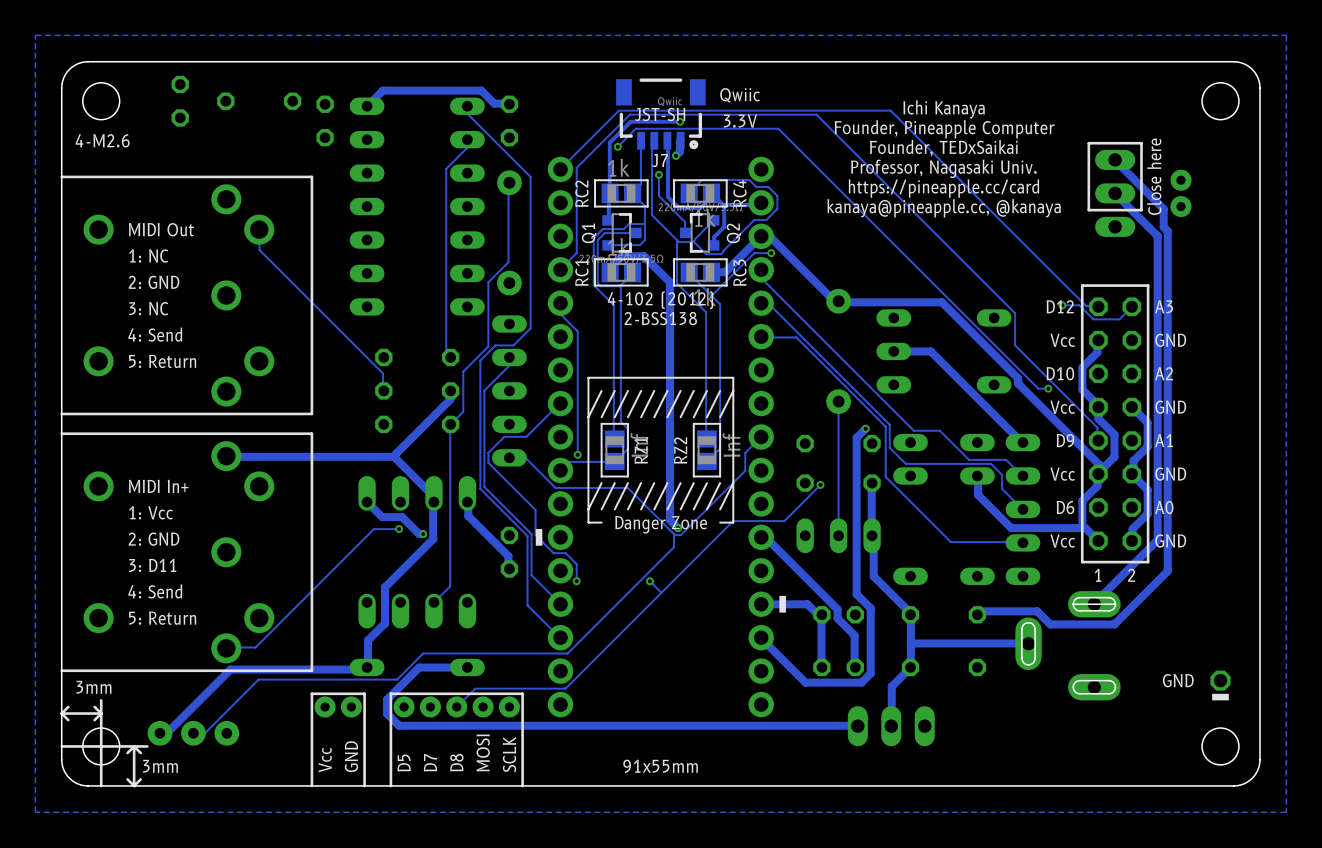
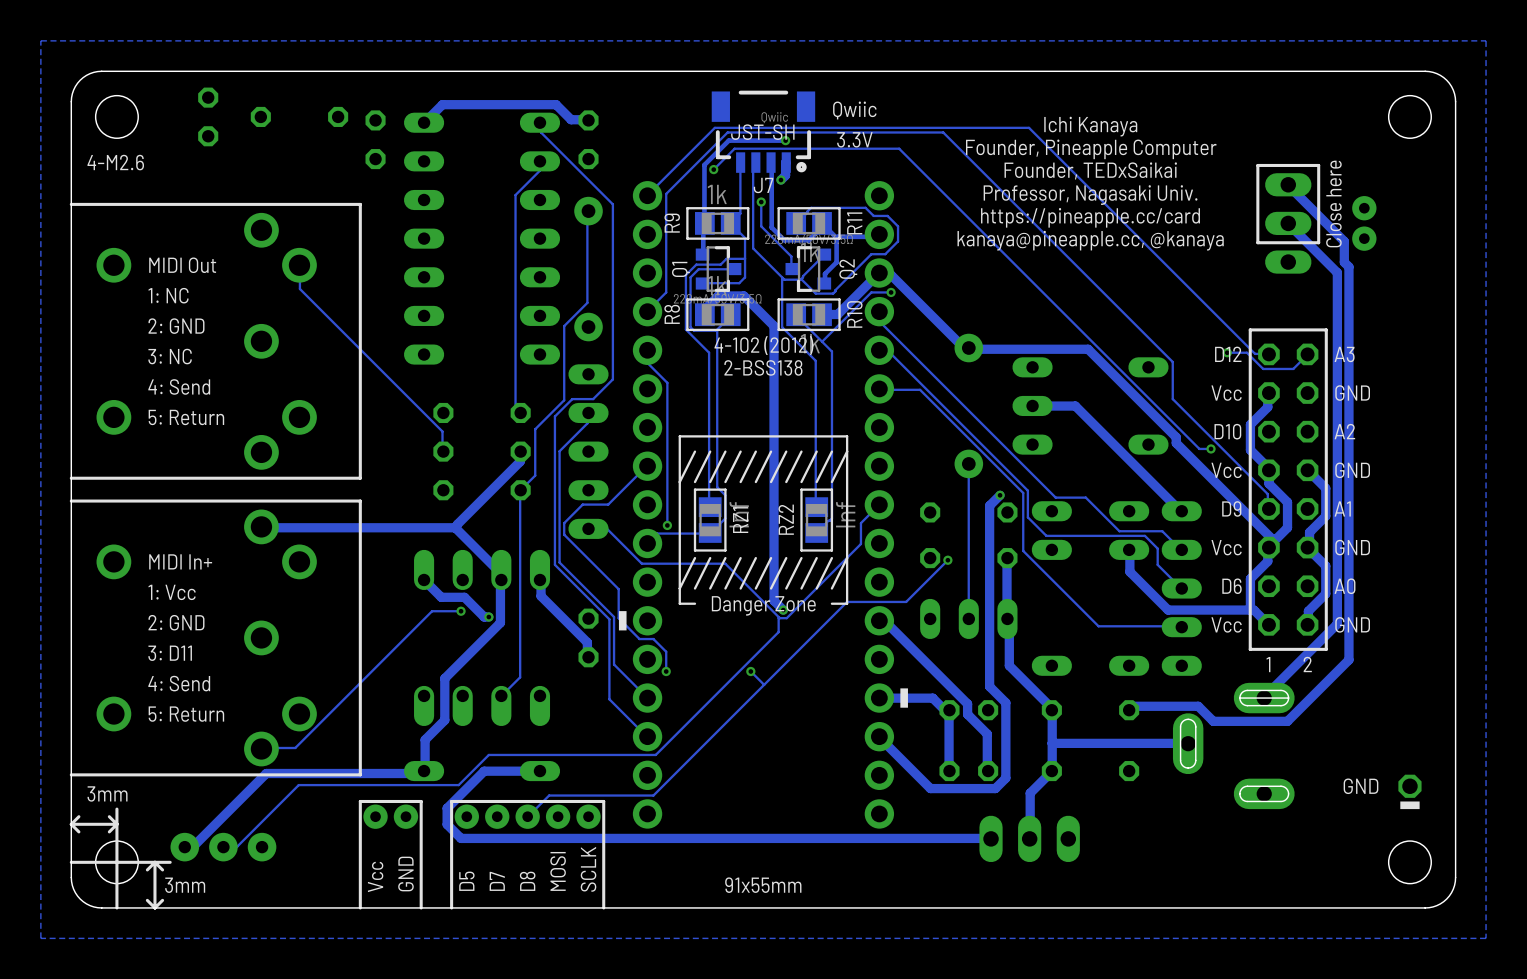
RC2 name: RC2 (581, 193) -> R9 (672, 223)
RC4 name: RC4 (739, 193) -> R11 (854, 223)
RC1 name: RC1 (581, 272) -> R8 (672, 314)
RC3 name: RC3 (739, 272) -> R10 (854, 314)

